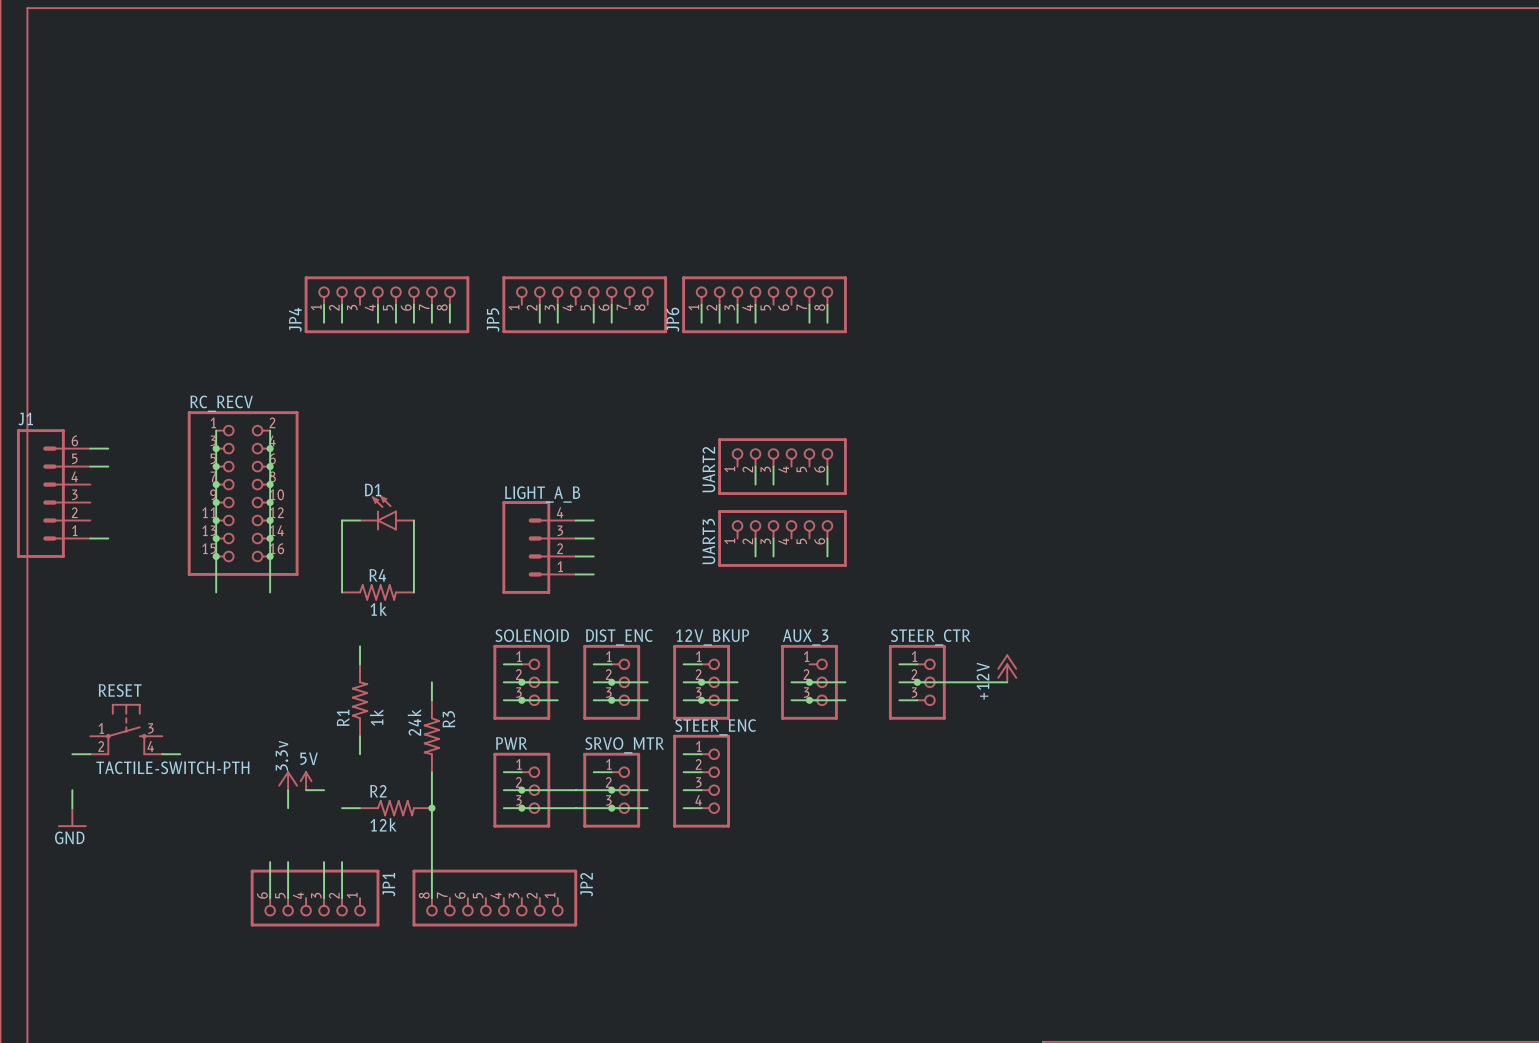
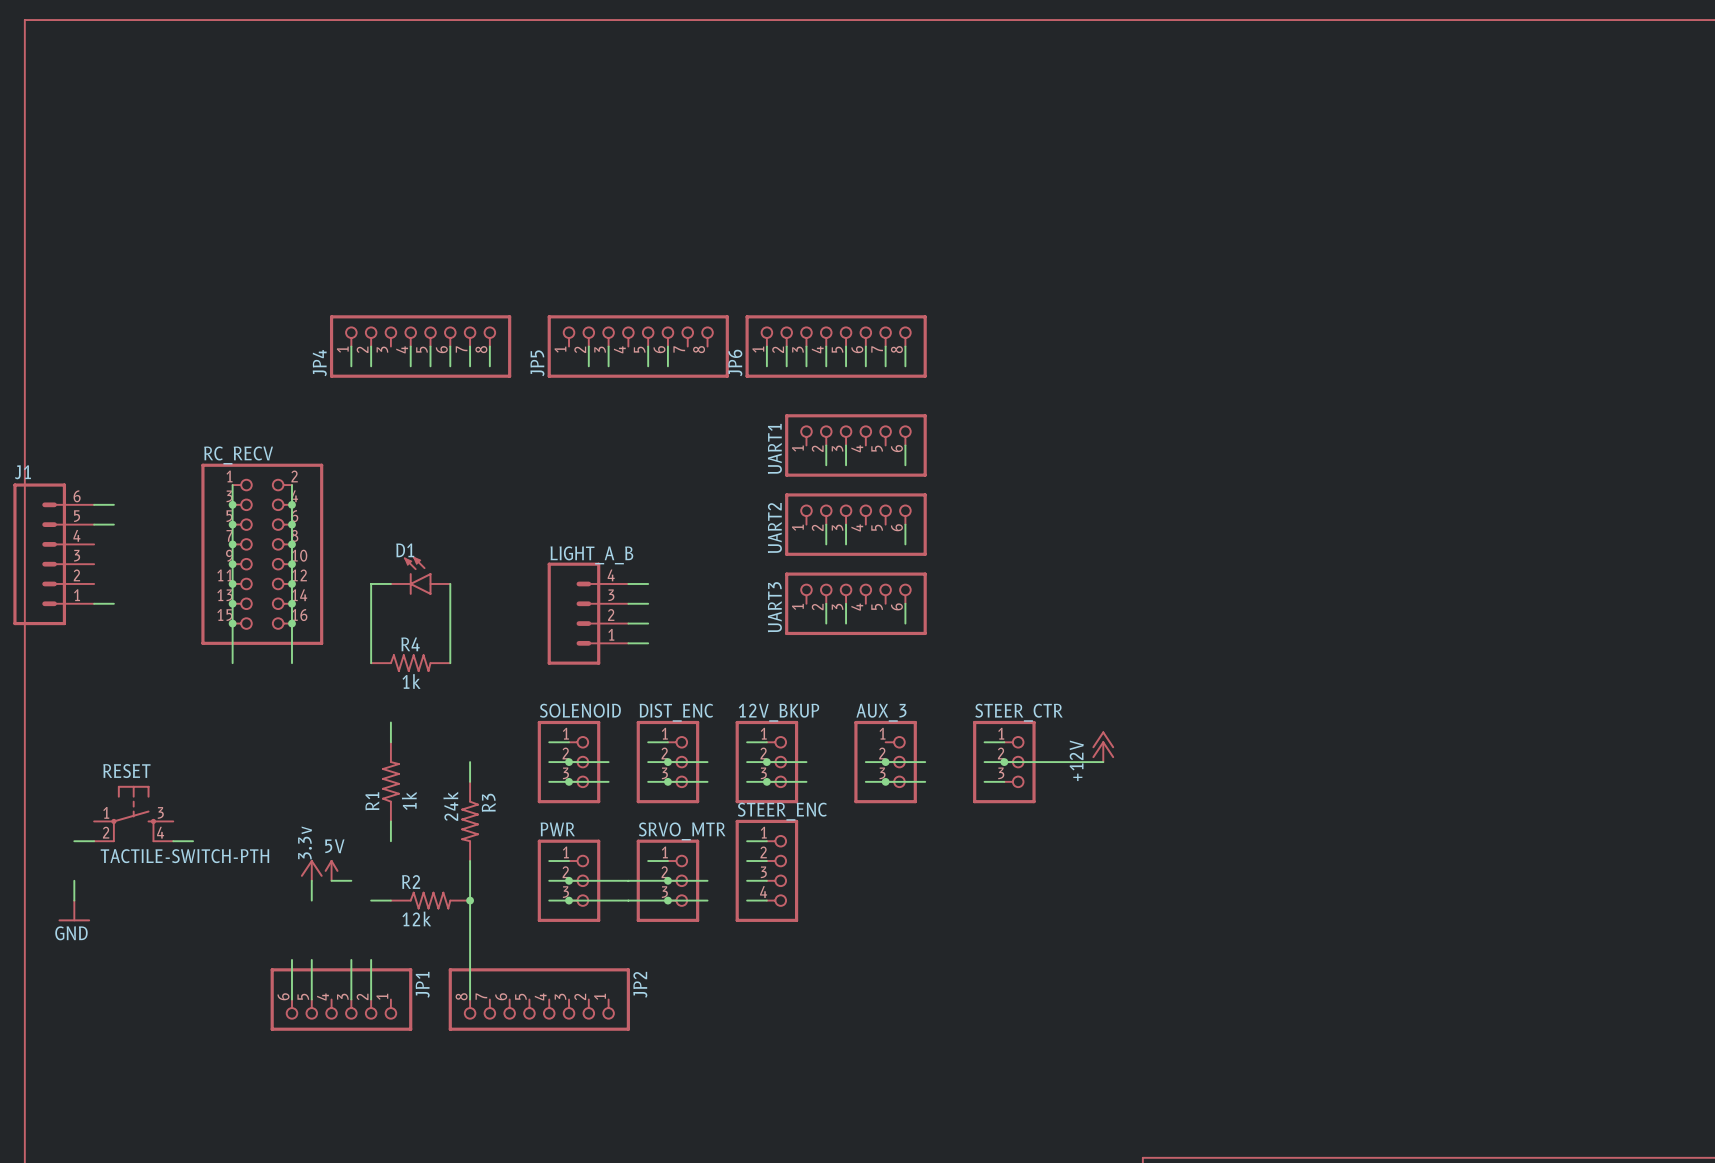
wire: none -> (846, 346) (846, 366)
wire: none -> (865, 346) (865, 366)
wire: none -> (826, 445) (826, 465)
wire: none -> (846, 445) (846, 465)
UART1: none -> (855, 445)
wire: none -> (905, 445) (905, 465)

